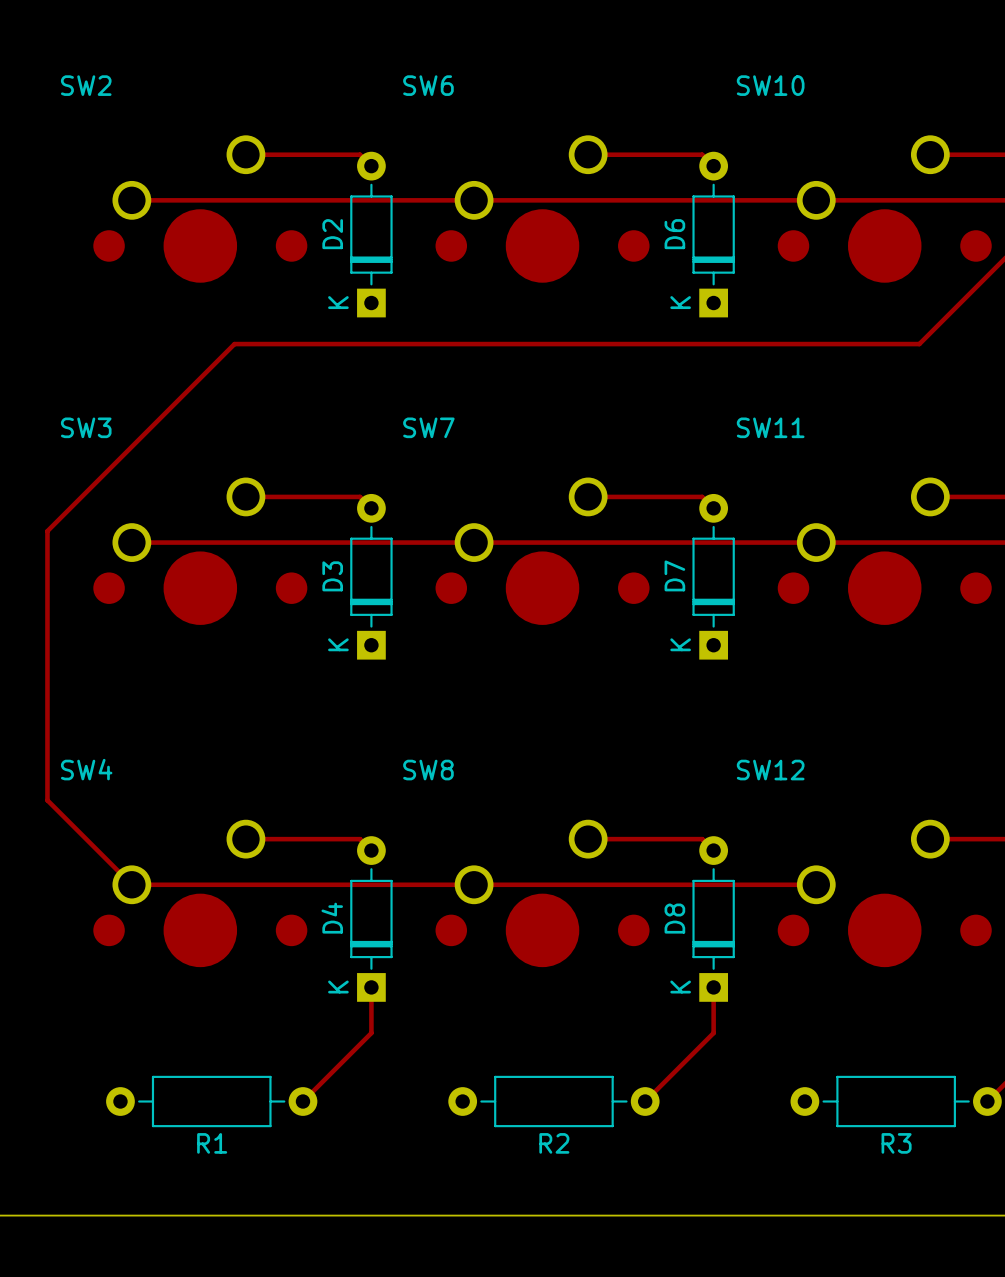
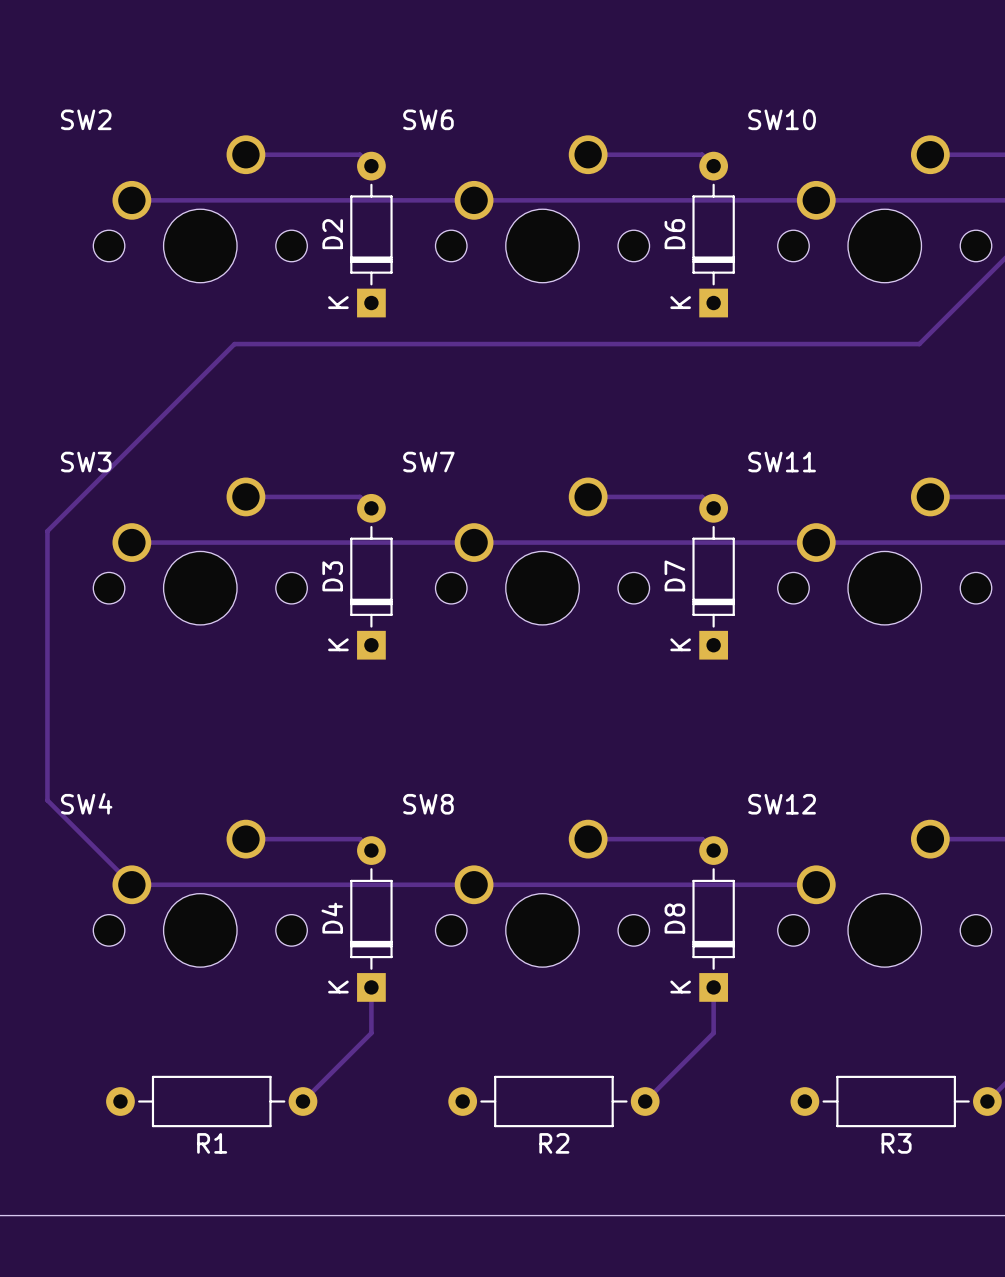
SW10 name position: SW10 (770, 85) -> SW10 (782, 119)
SW2 footprint: [93, 135, 308, 283] -> [93, 135, 308, 283]
SW6 footprint: [435, 135, 650, 283] -> [435, 135, 650, 283]
SW10 footprint: [777, 135, 992, 283] -> [777, 135, 992, 283]
SW11 name position: SW11 (770, 427) -> SW11 (782, 462)
SW3 footprint: [93, 477, 308, 625] -> [93, 477, 308, 625]
SW7 footprint: [435, 477, 650, 625] -> [435, 477, 650, 625]
SW11 footprint: [777, 477, 992, 625] -> [777, 477, 992, 625]
SW12 name position: SW12 (770, 770) -> SW12 (782, 804)
SW4 footprint: [93, 819, 308, 968] -> [93, 819, 308, 968]
SW8 footprint: [435, 819, 650, 968] -> [435, 819, 650, 968]
SW12 footprint: [777, 819, 992, 968] -> [777, 819, 992, 968]

